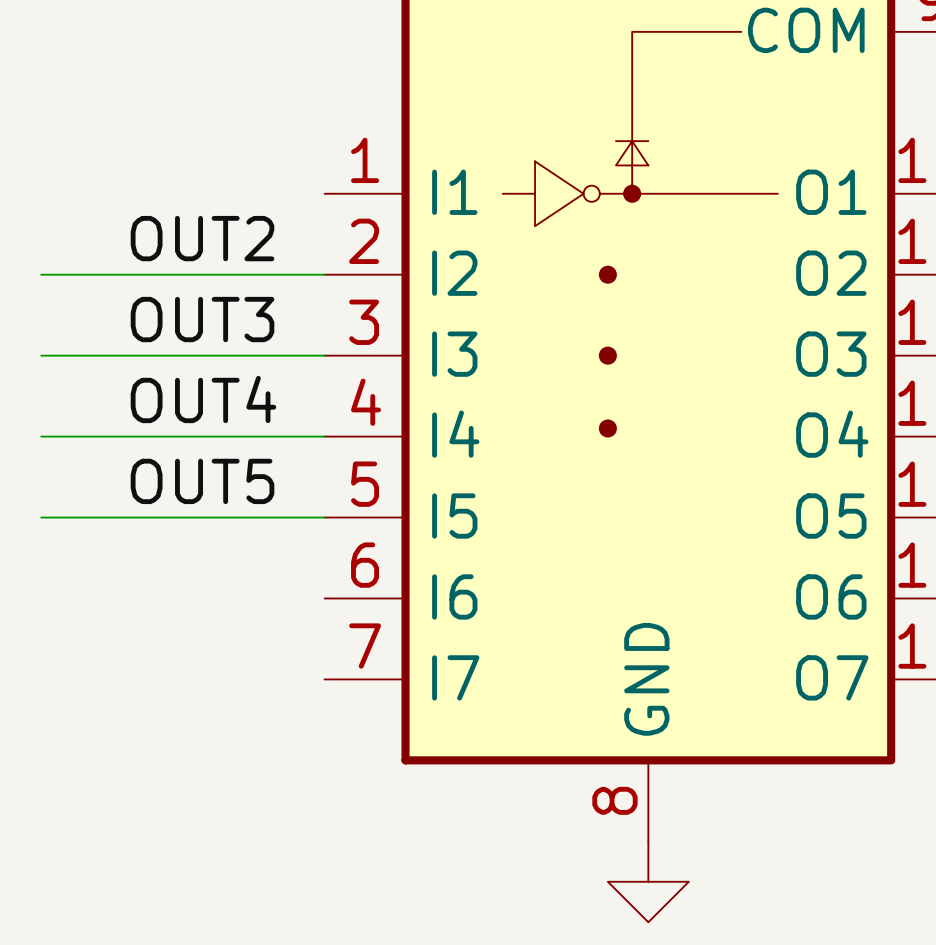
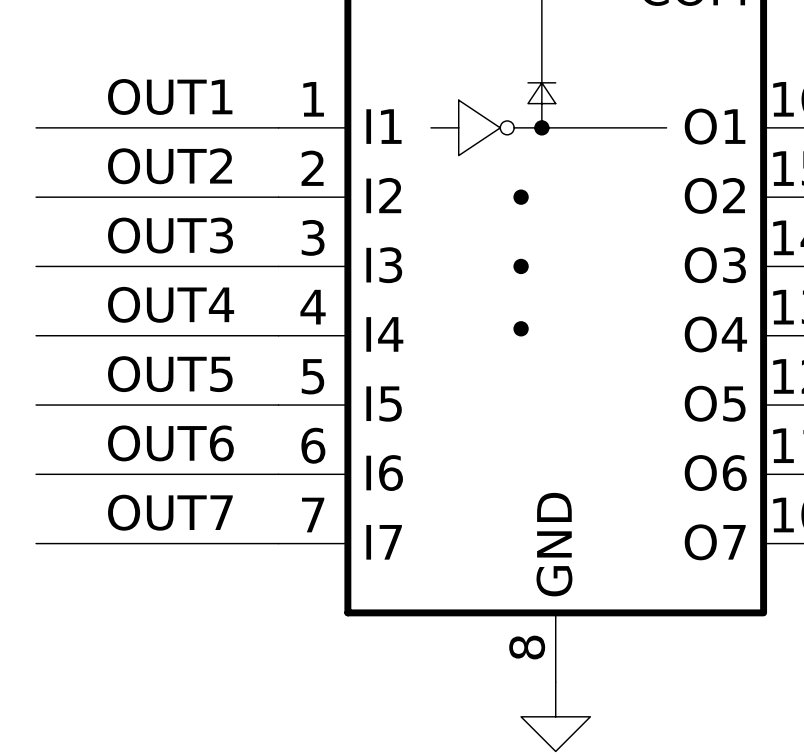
label: none -> OUT1 (170, 96)
wire: none -> (36, 127) (278, 127)
label: none -> OUT6 (170, 443)
wire: none -> (36, 474) (278, 474)
label: none -> OUT7 (170, 512)
wire: none -> (36, 543) (278, 543)

